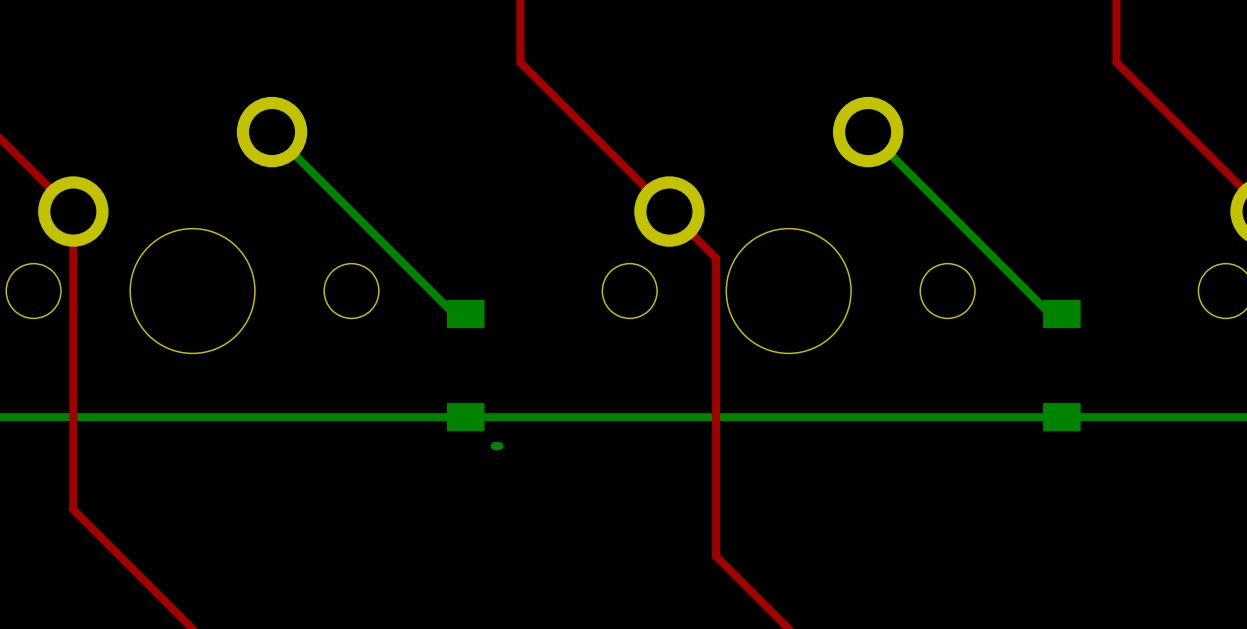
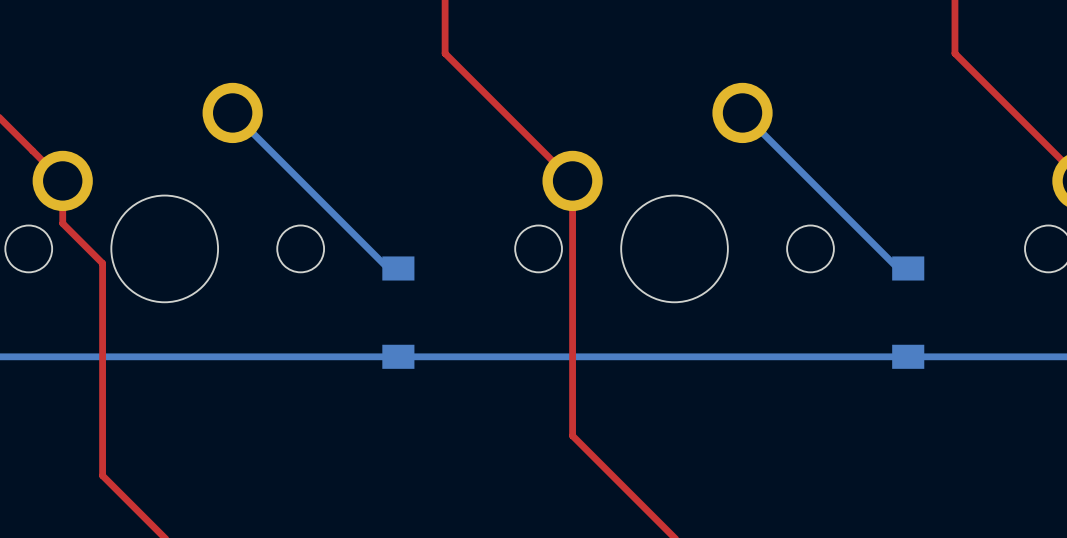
top track: (669, 211) (716, 258) (716, 556) -> (572, 180) (572, 435) (612, 475)
top track: (73, 261) (73, 509) (119, 556) -> (62, 223) (102, 263) (102, 475)
bottom track: (494, 446) (499, 446) -> none

